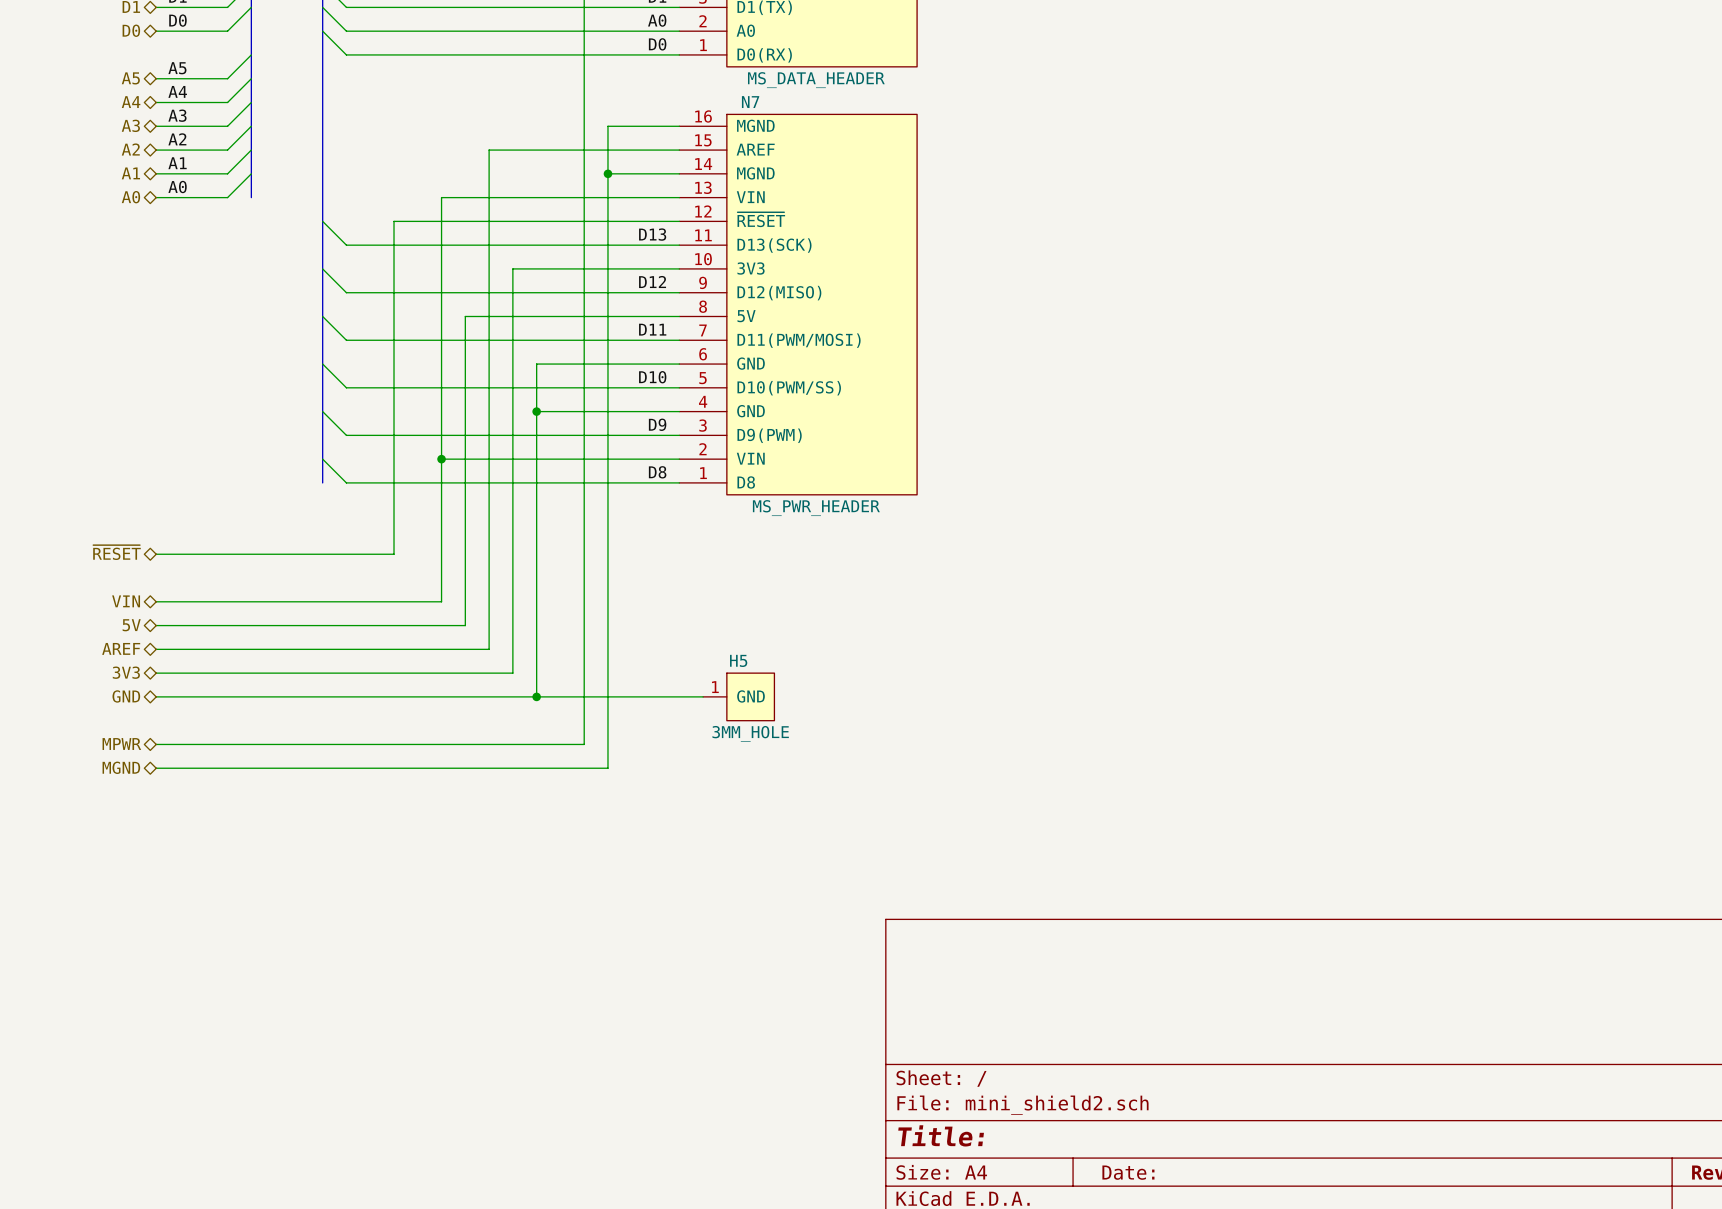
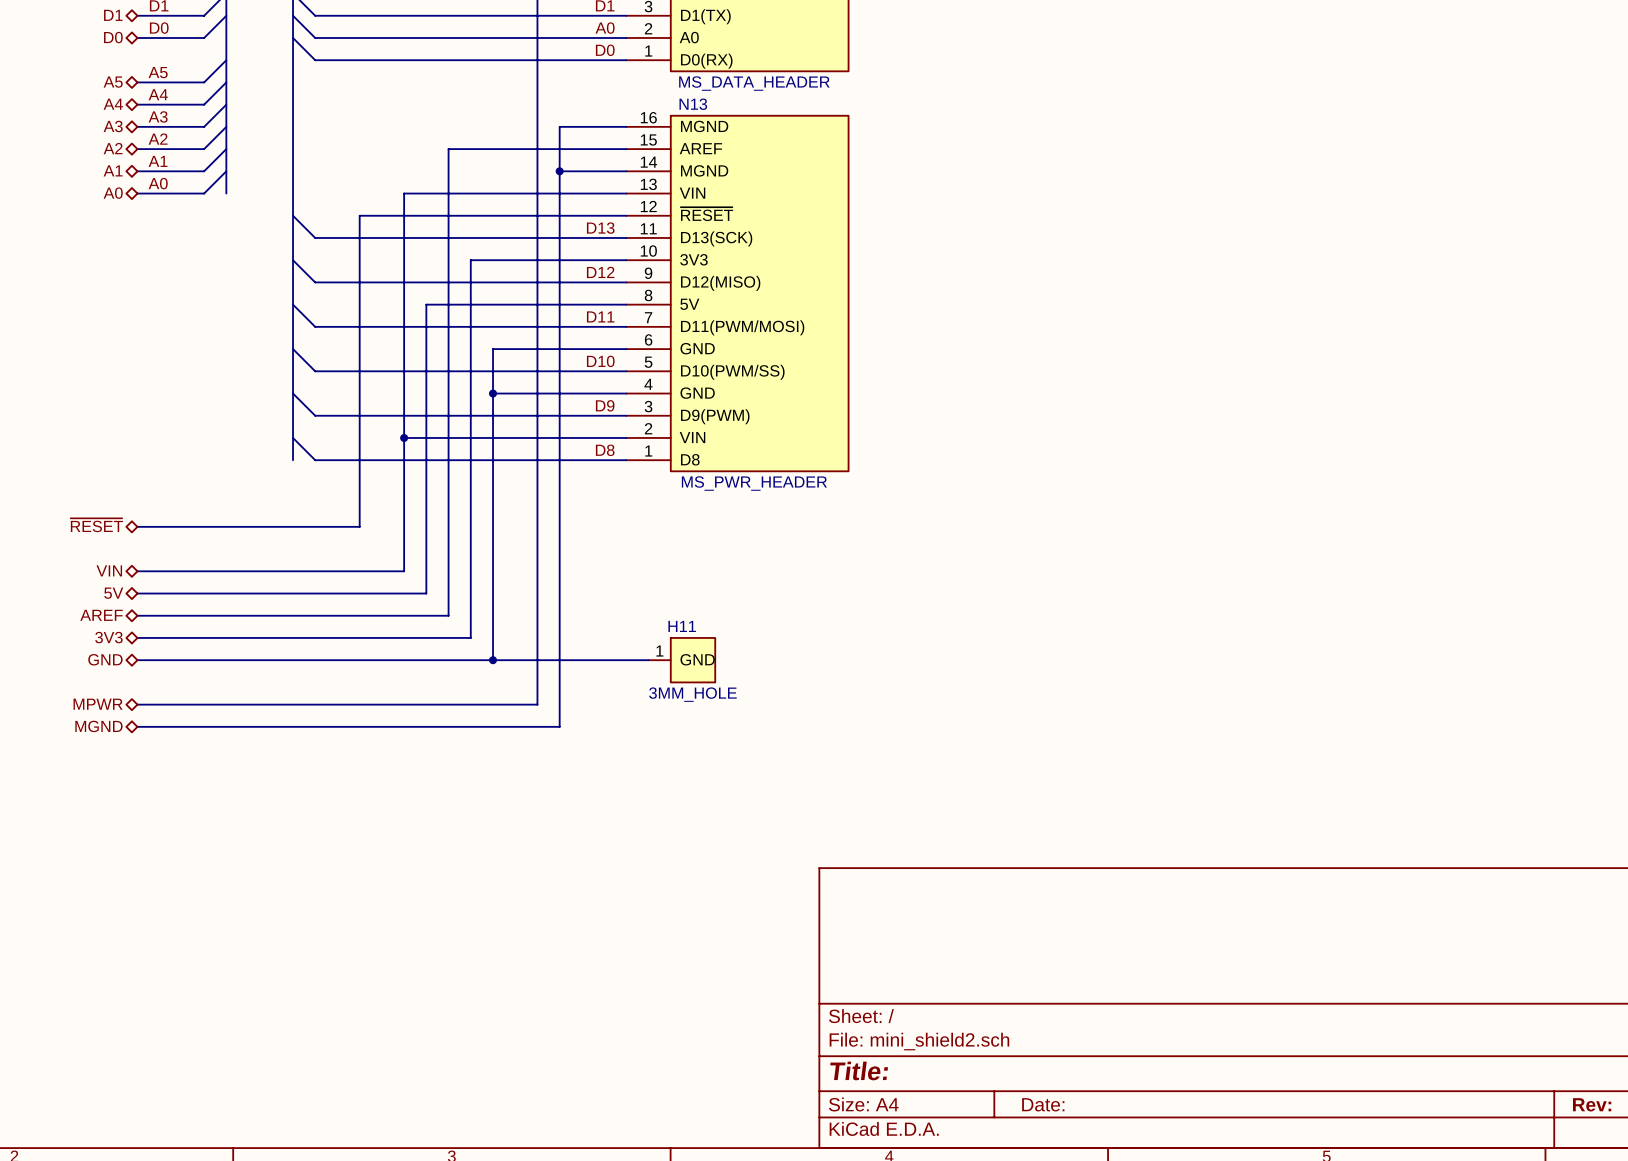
N7 name: N7 (750, 102) -> N13 (693, 104)
H5 name: H5 (738, 660) -> H11 (682, 626)

